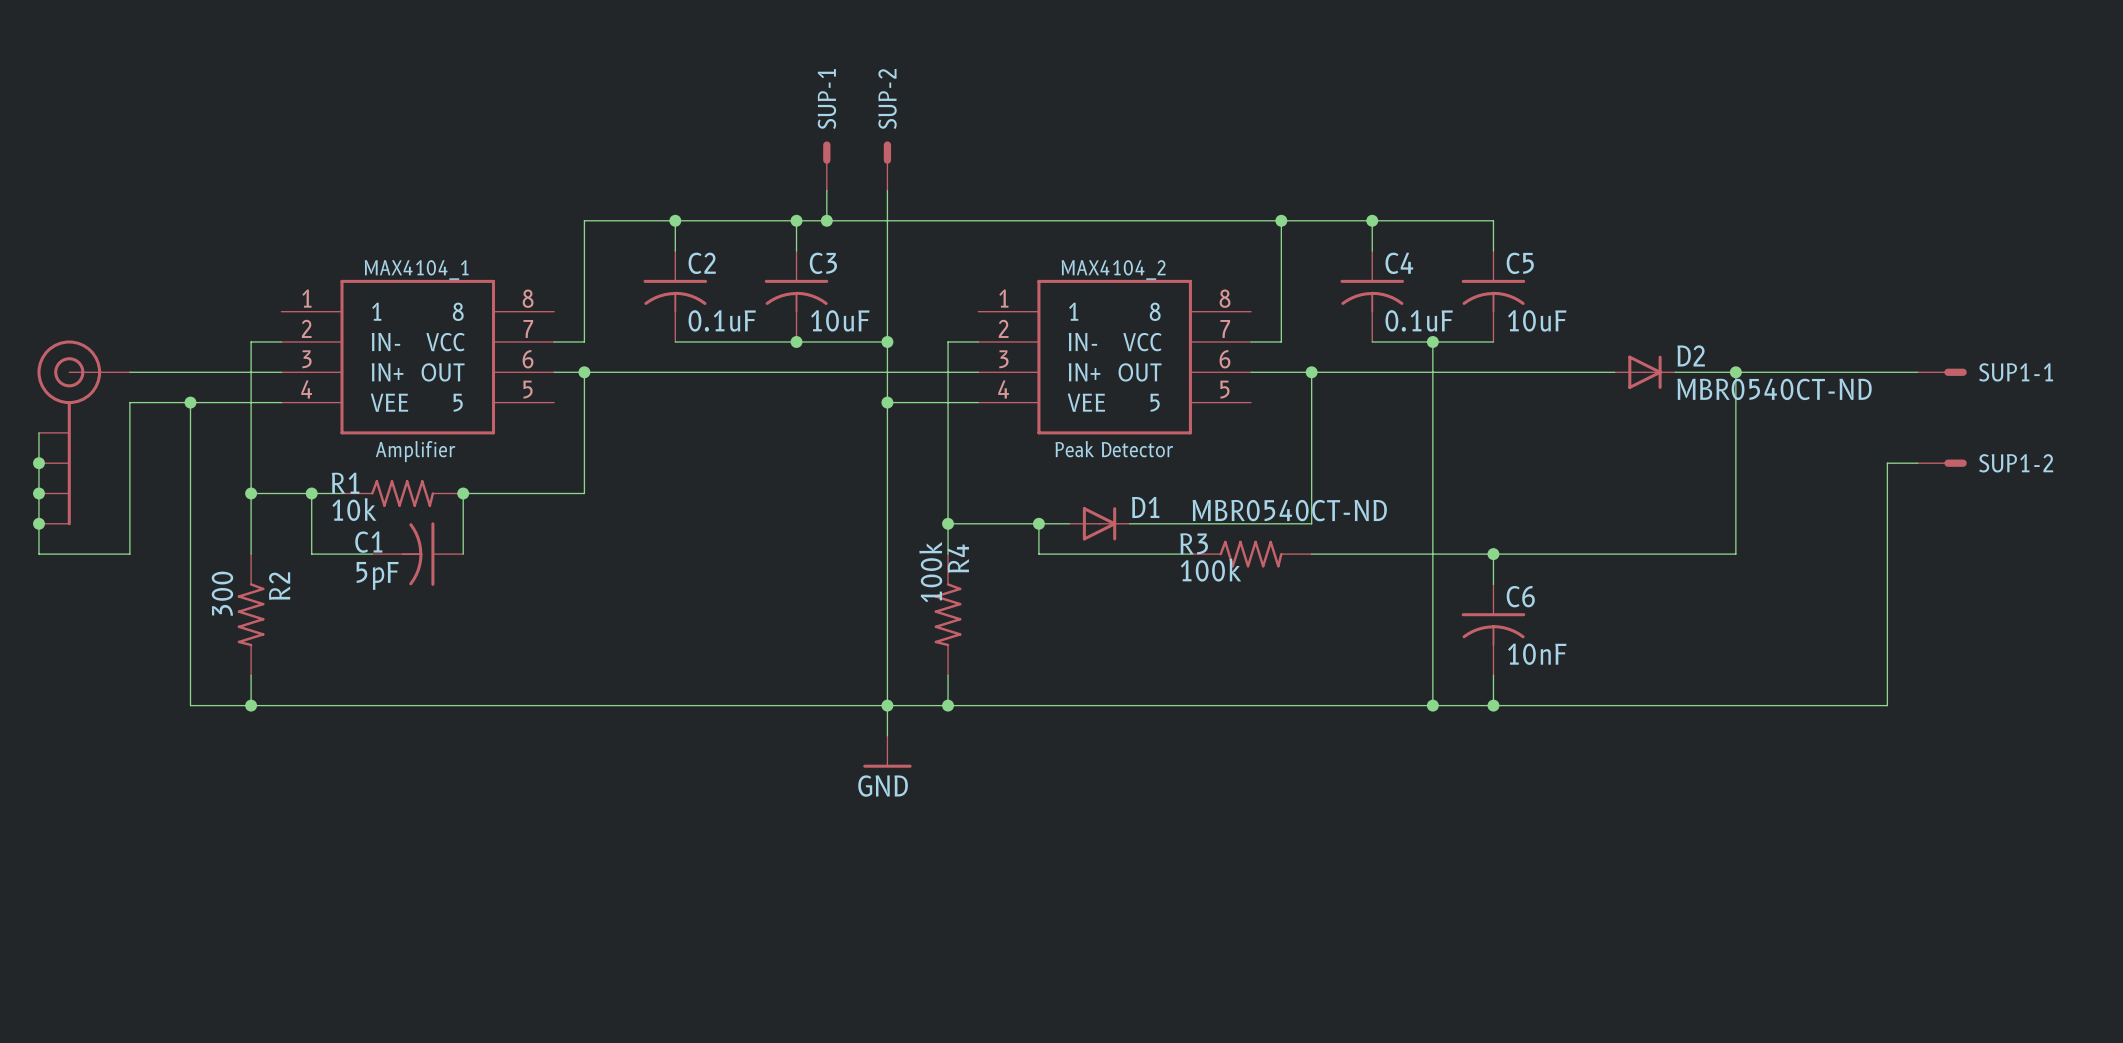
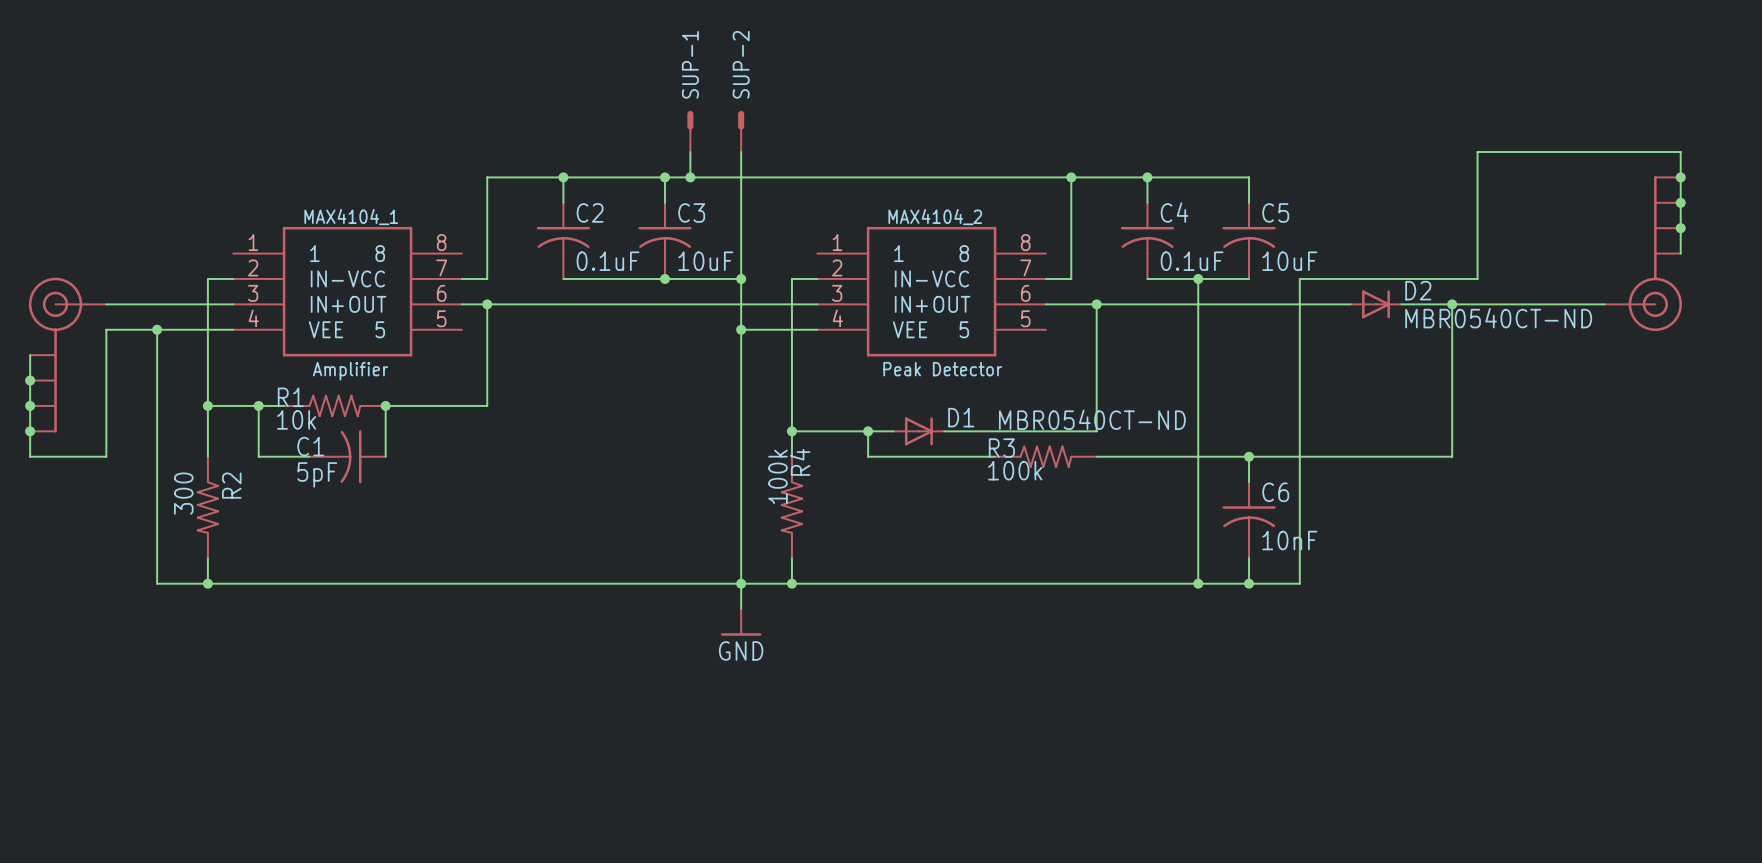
junction: none -> (1680, 177)
junction: none -> (1680, 202)
junction: none -> (1680, 228)
part: none -> (1643, 253)
SUP1-1: (1942, 372) -> none
wire: (1917, 463) (1887, 463) (1887, 705) (1554, 705) -> (1680, 253) (1680, 152) (1477, 152) (1477, 278) (1299, 278) (1299, 583)
SUP1-2: (1942, 463) -> none

